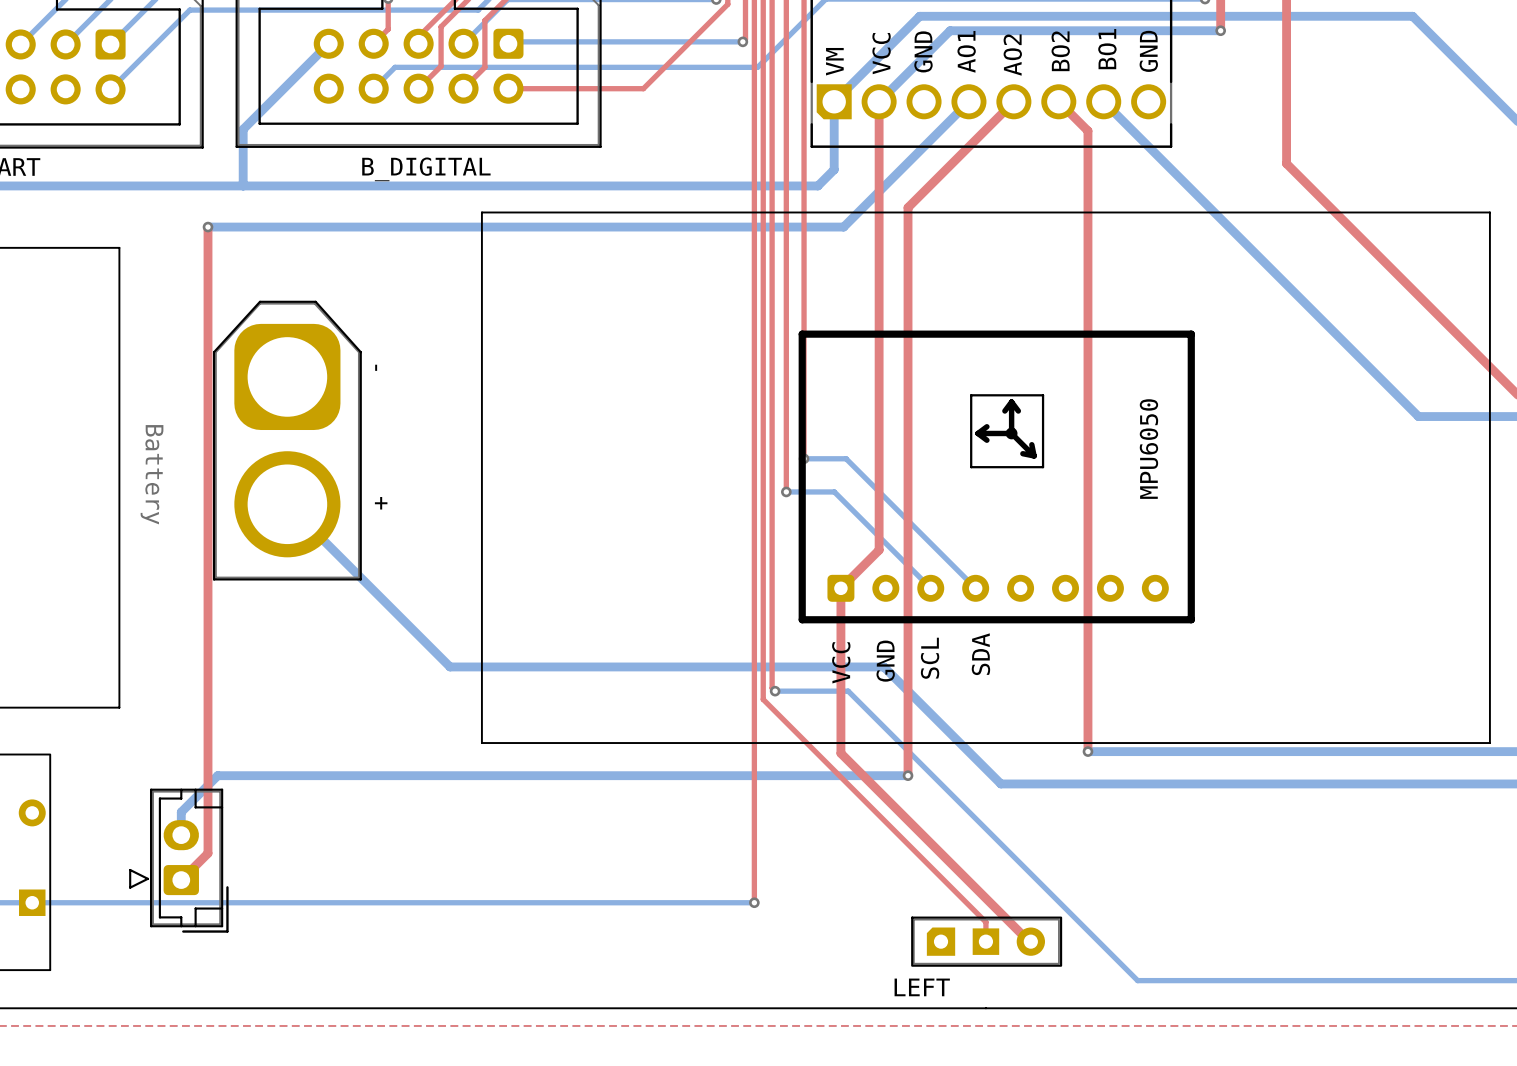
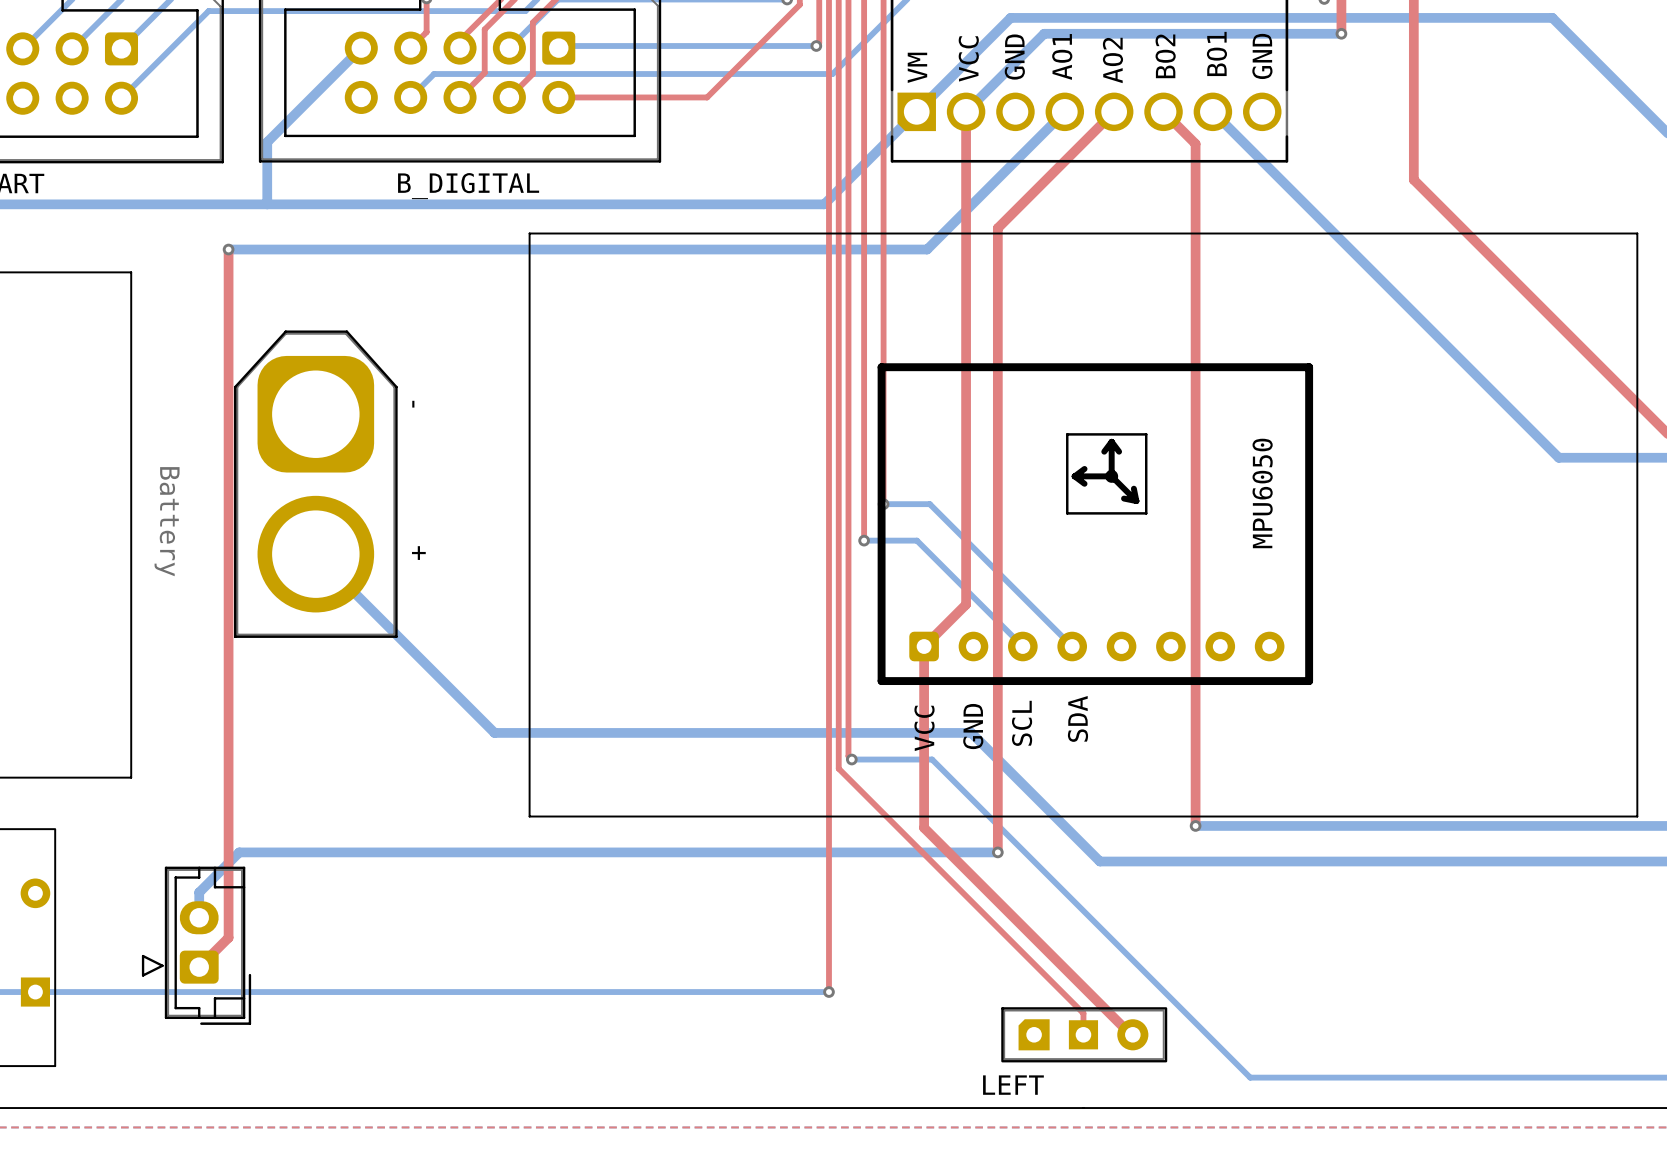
bottom track: (834, 101) (834, 169) (817, 185) (750, 185) -> (916, 111) (824, 204)

